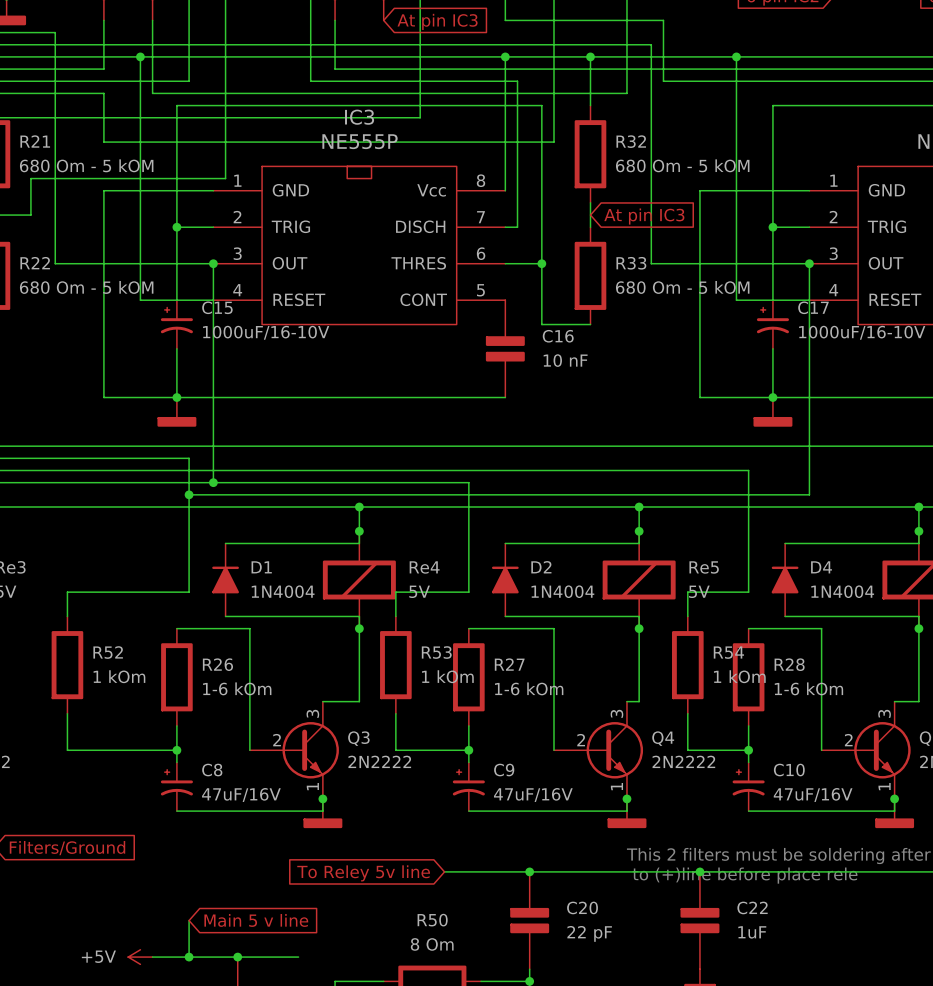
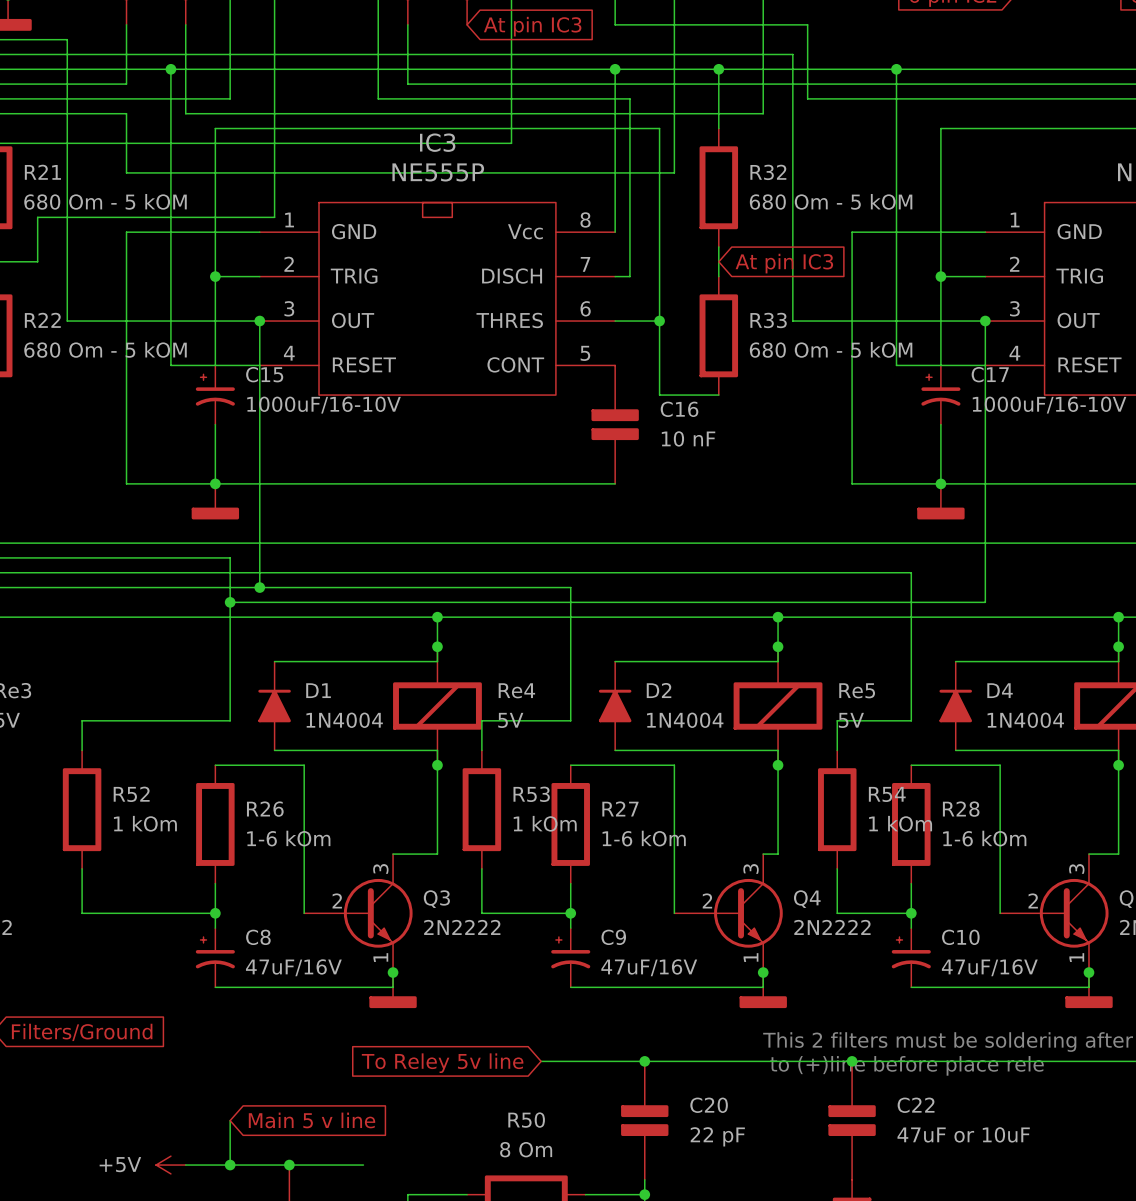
C22 value: 1uF (752, 932) -> 47uF or 10uF (963, 1134)

